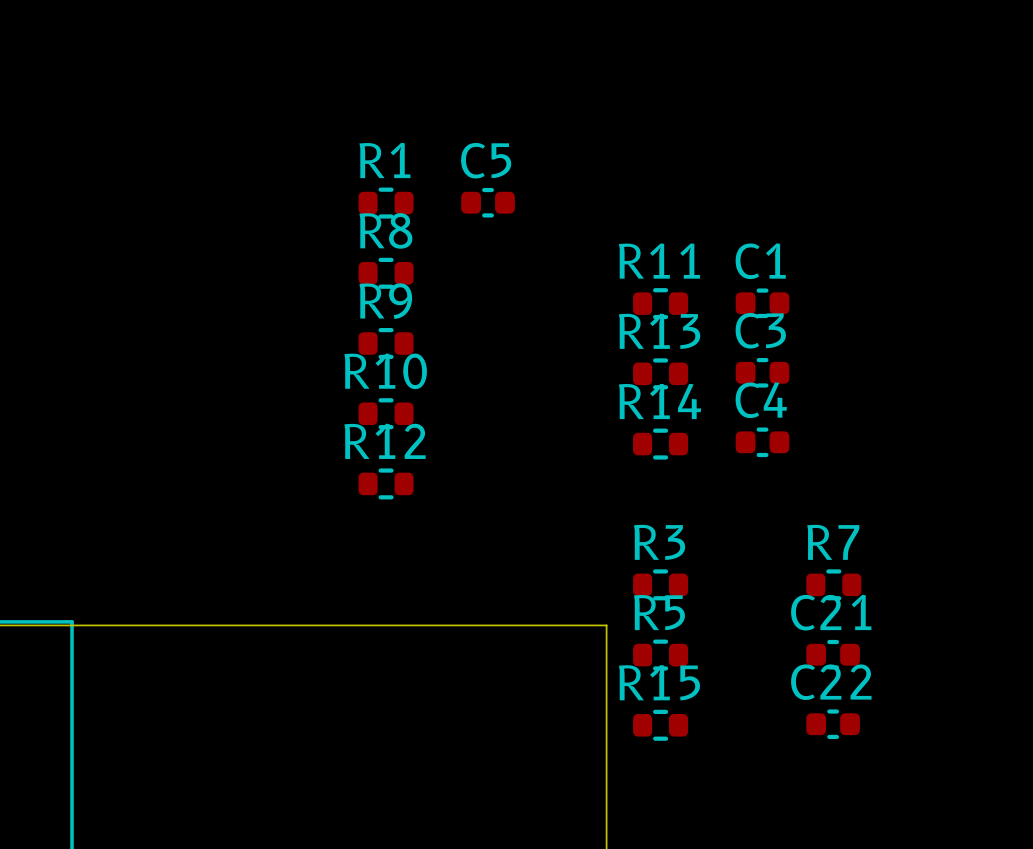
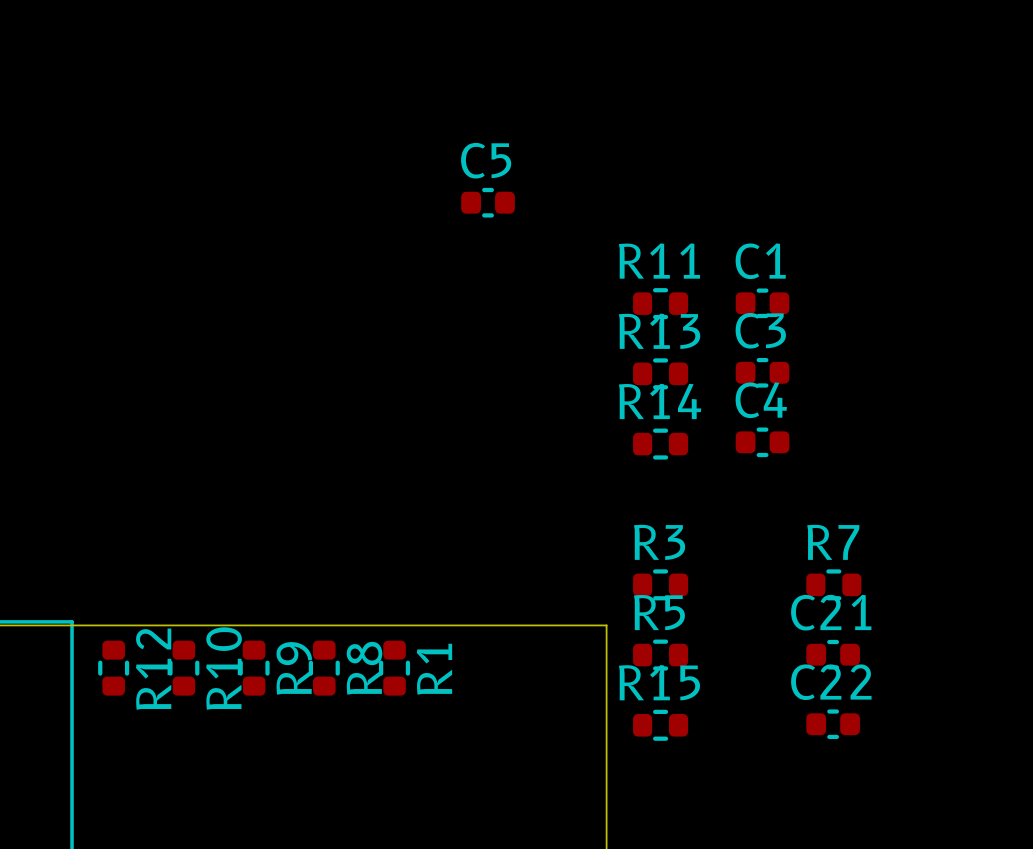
R1 rotation: 0° (386, 203) -> 90° clockwise (394, 668)
R1 position: (386, 203) -> (394, 668)
R8 rotation: 0° (386, 273) -> 90° clockwise (324, 668)
R8 position: (386, 273) -> (324, 668)
R9 rotation: 0° (386, 343) -> 90° clockwise (254, 668)
R9 position: (386, 343) -> (254, 668)
R10 rotation: 0° (386, 413) -> 90° clockwise (183, 668)
R10 position: (386, 413) -> (183, 668)
R12 rotation: 0° (386, 483) -> 90° clockwise (113, 668)
R12 position: (386, 483) -> (113, 668)

